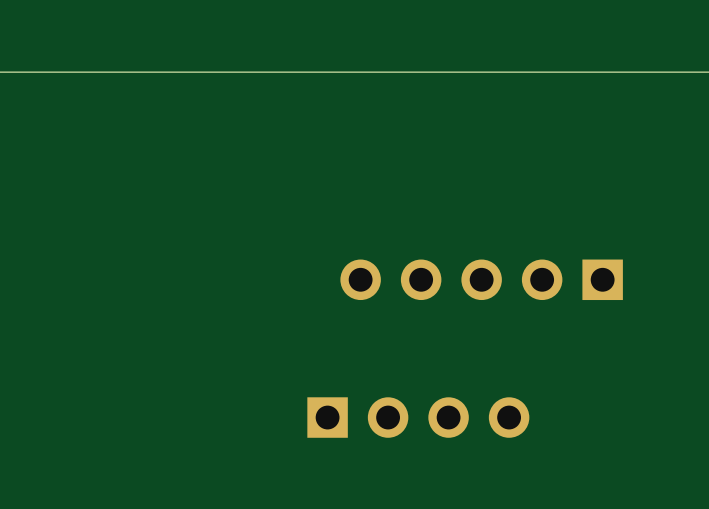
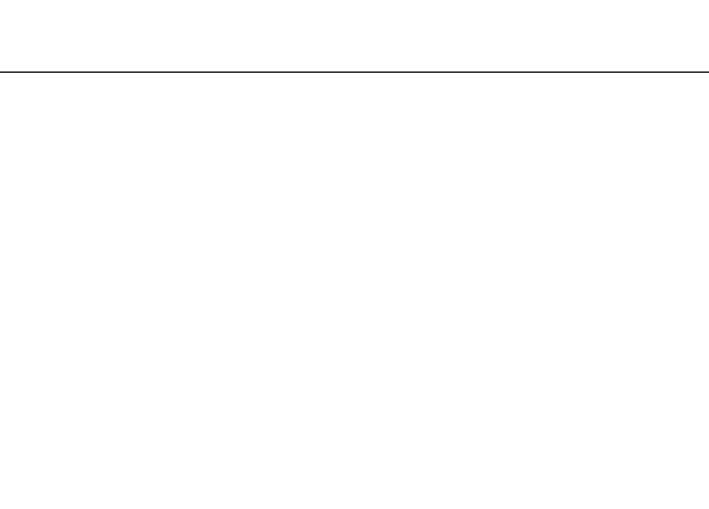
part: (481, 279) -> none
part: (418, 417) -> none

